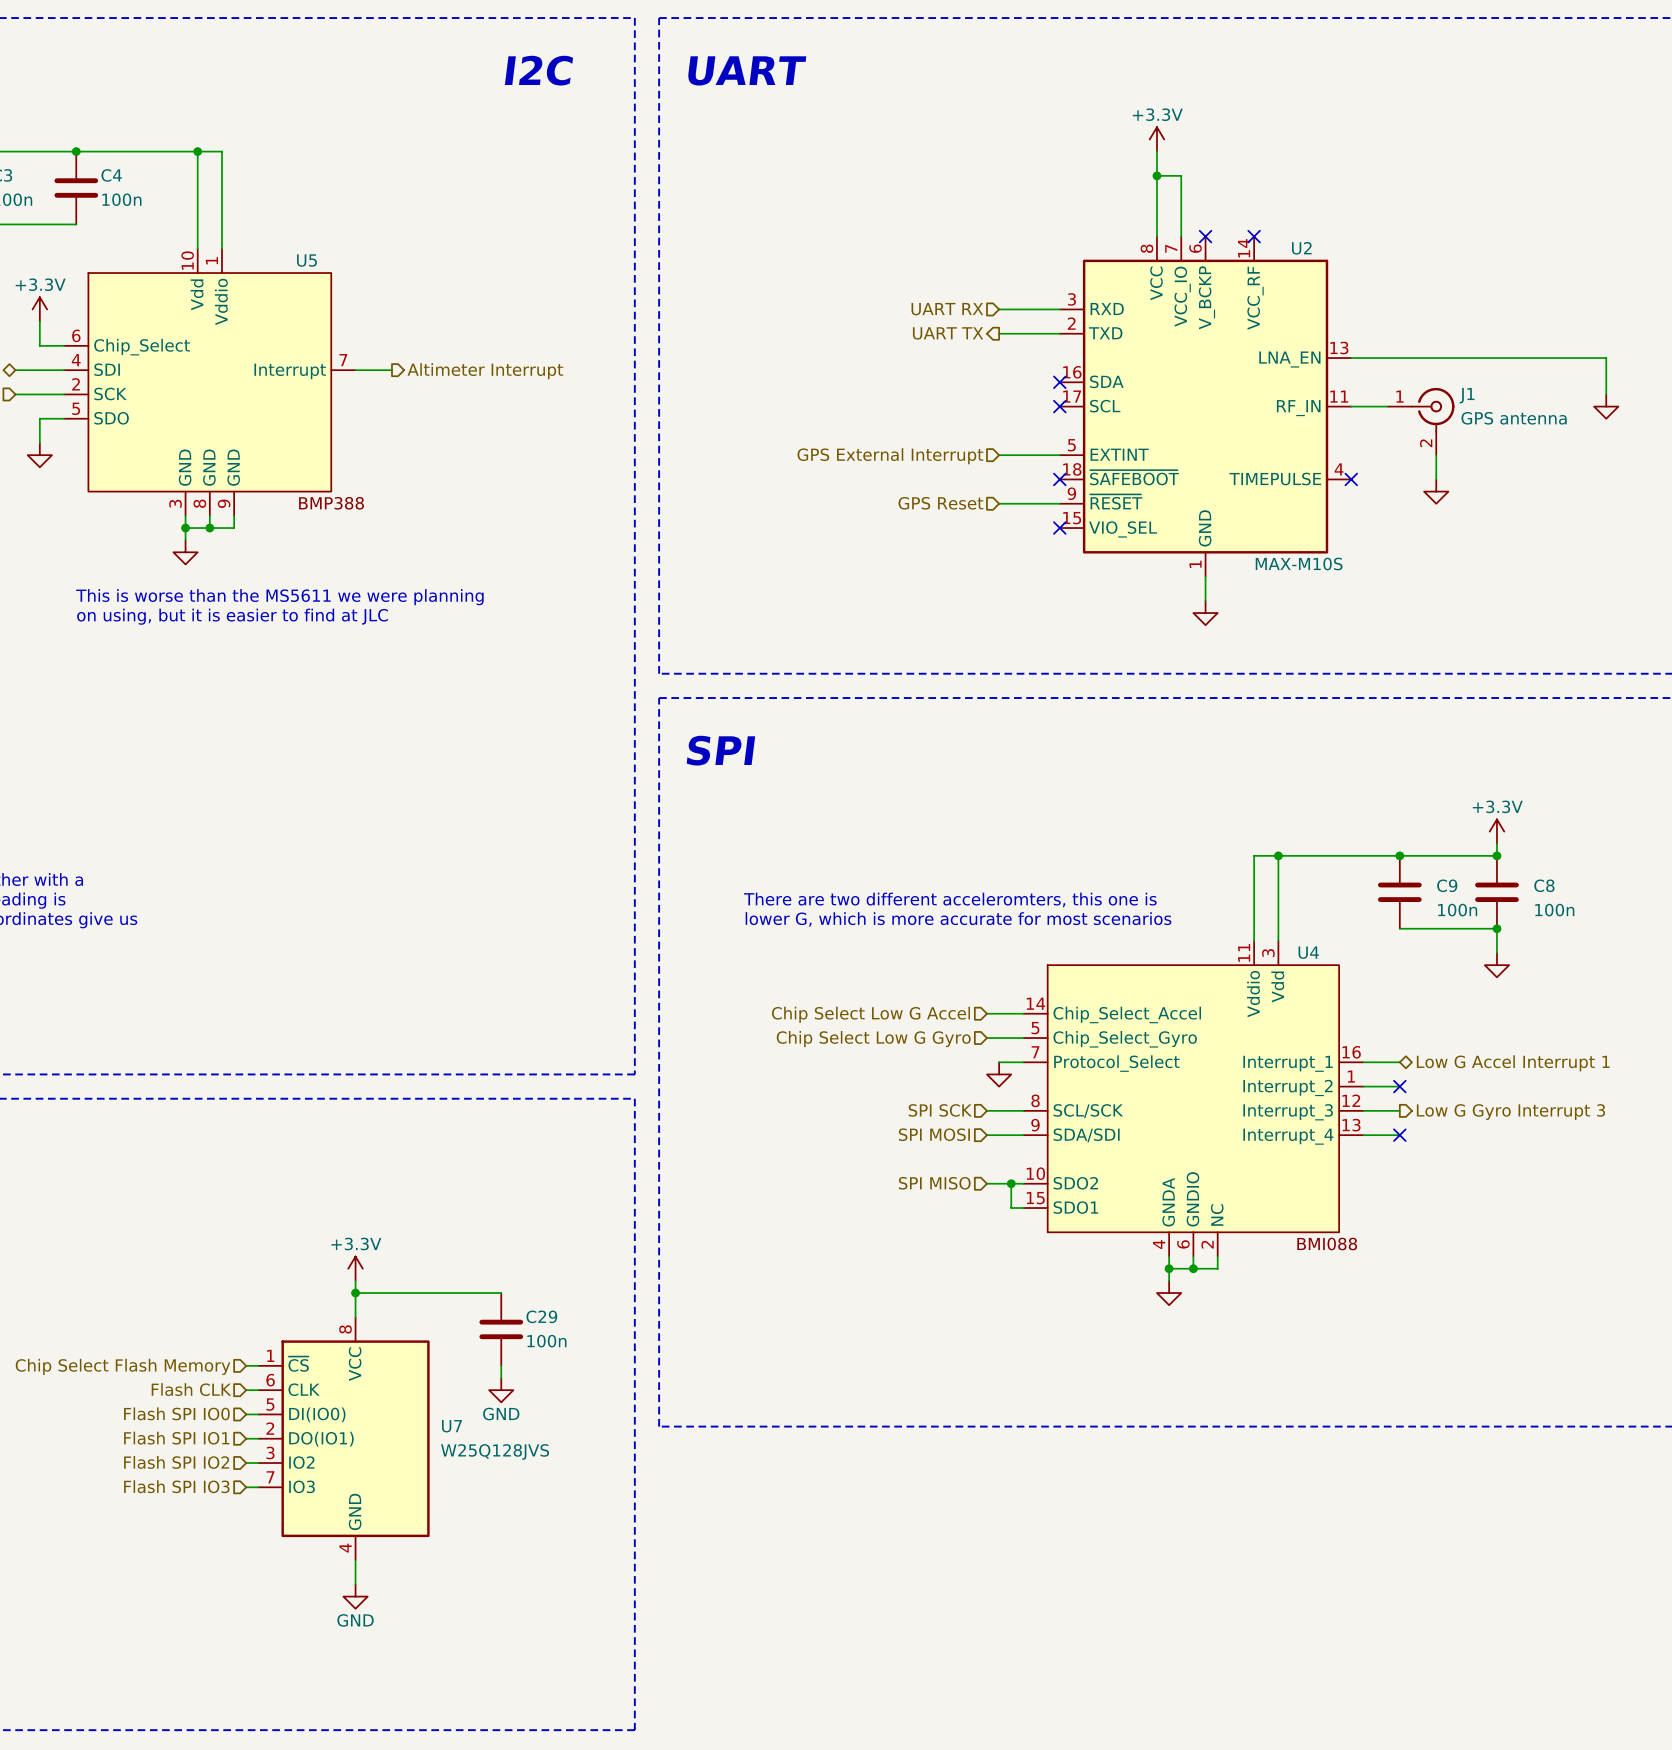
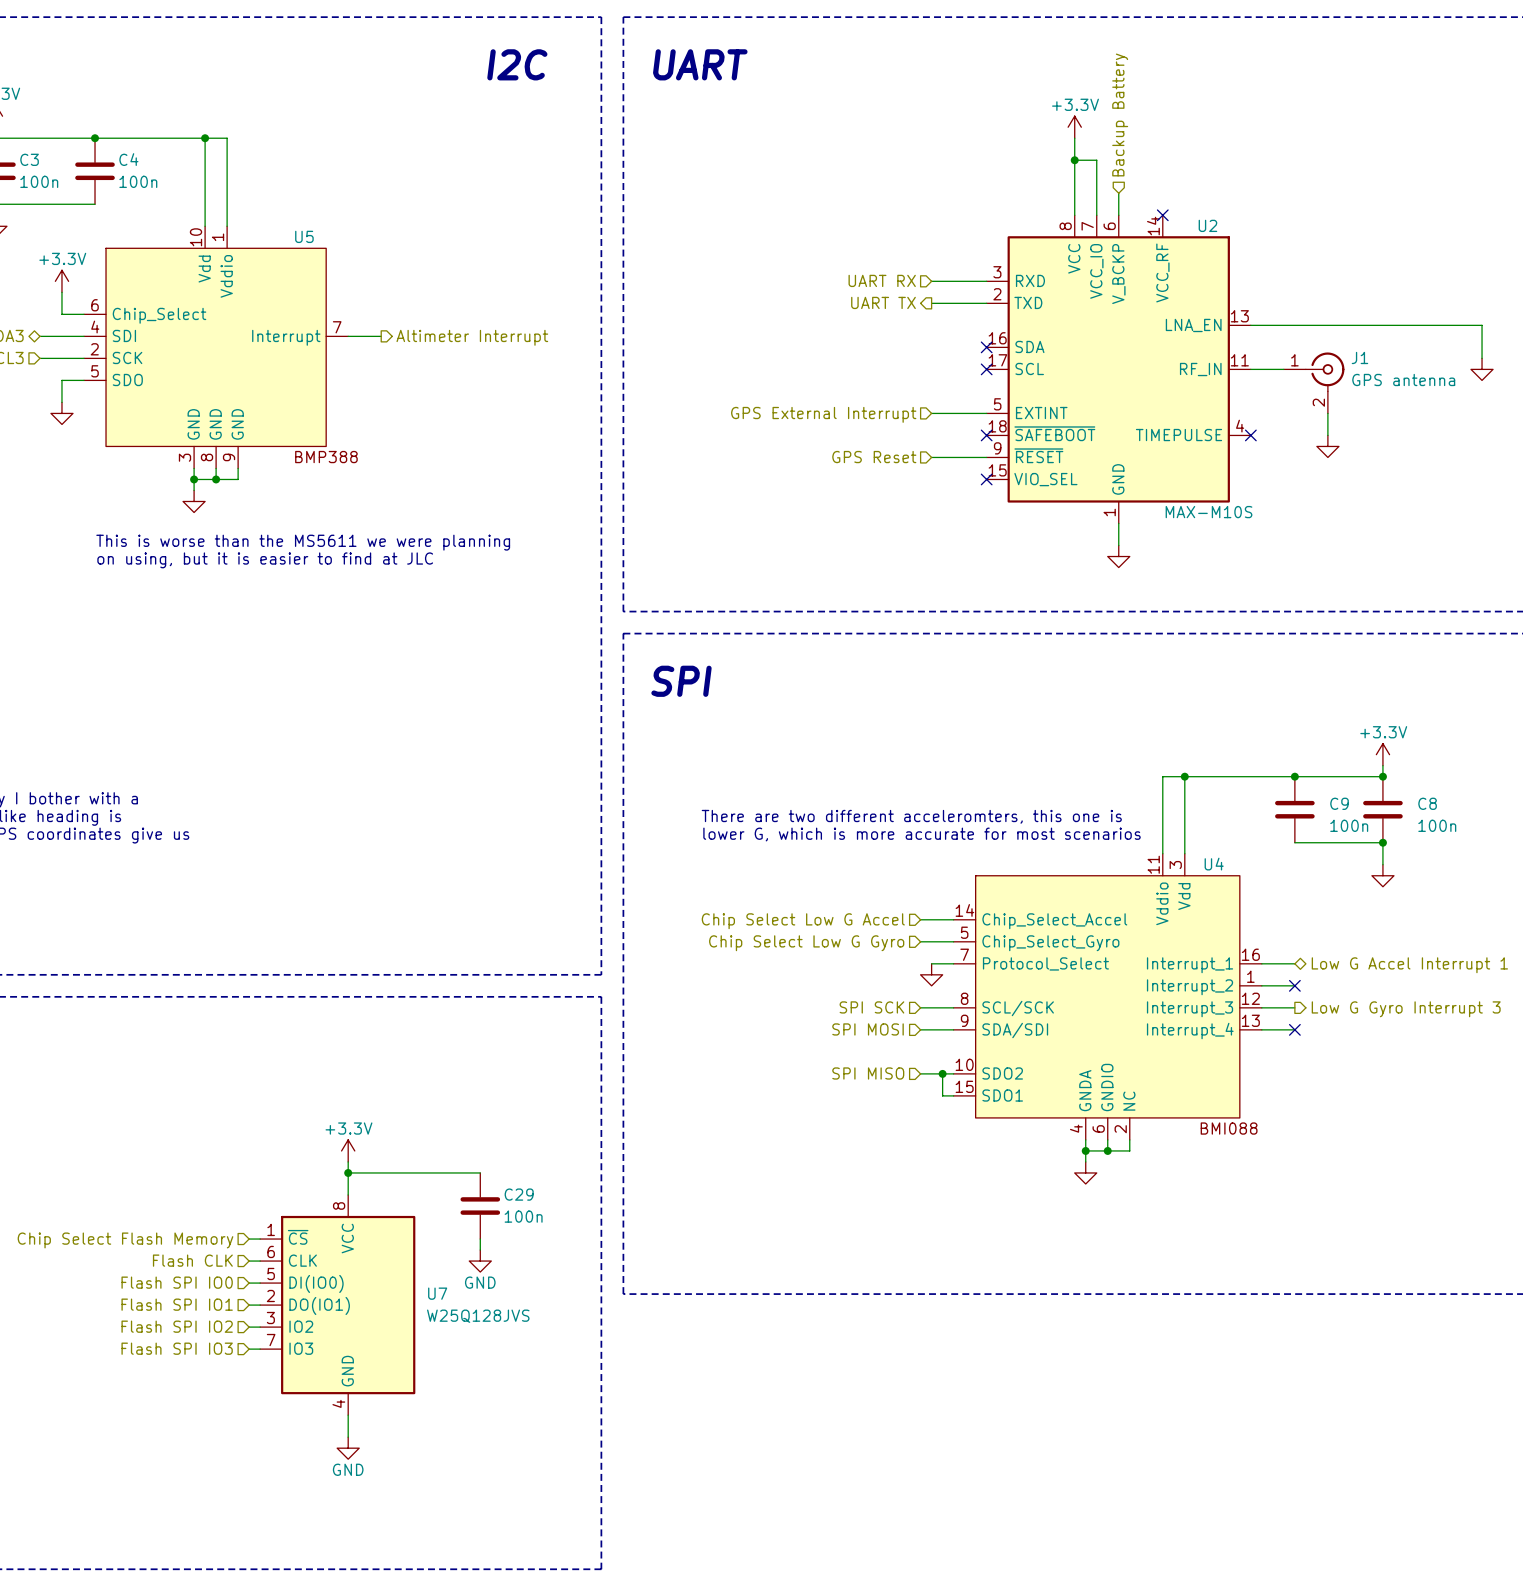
hierarchical label: none -> Backup Battery (1120, 114)
wire: none -> (1118, 193) (1118, 215)
no-connect mark: (1205, 236) -> none

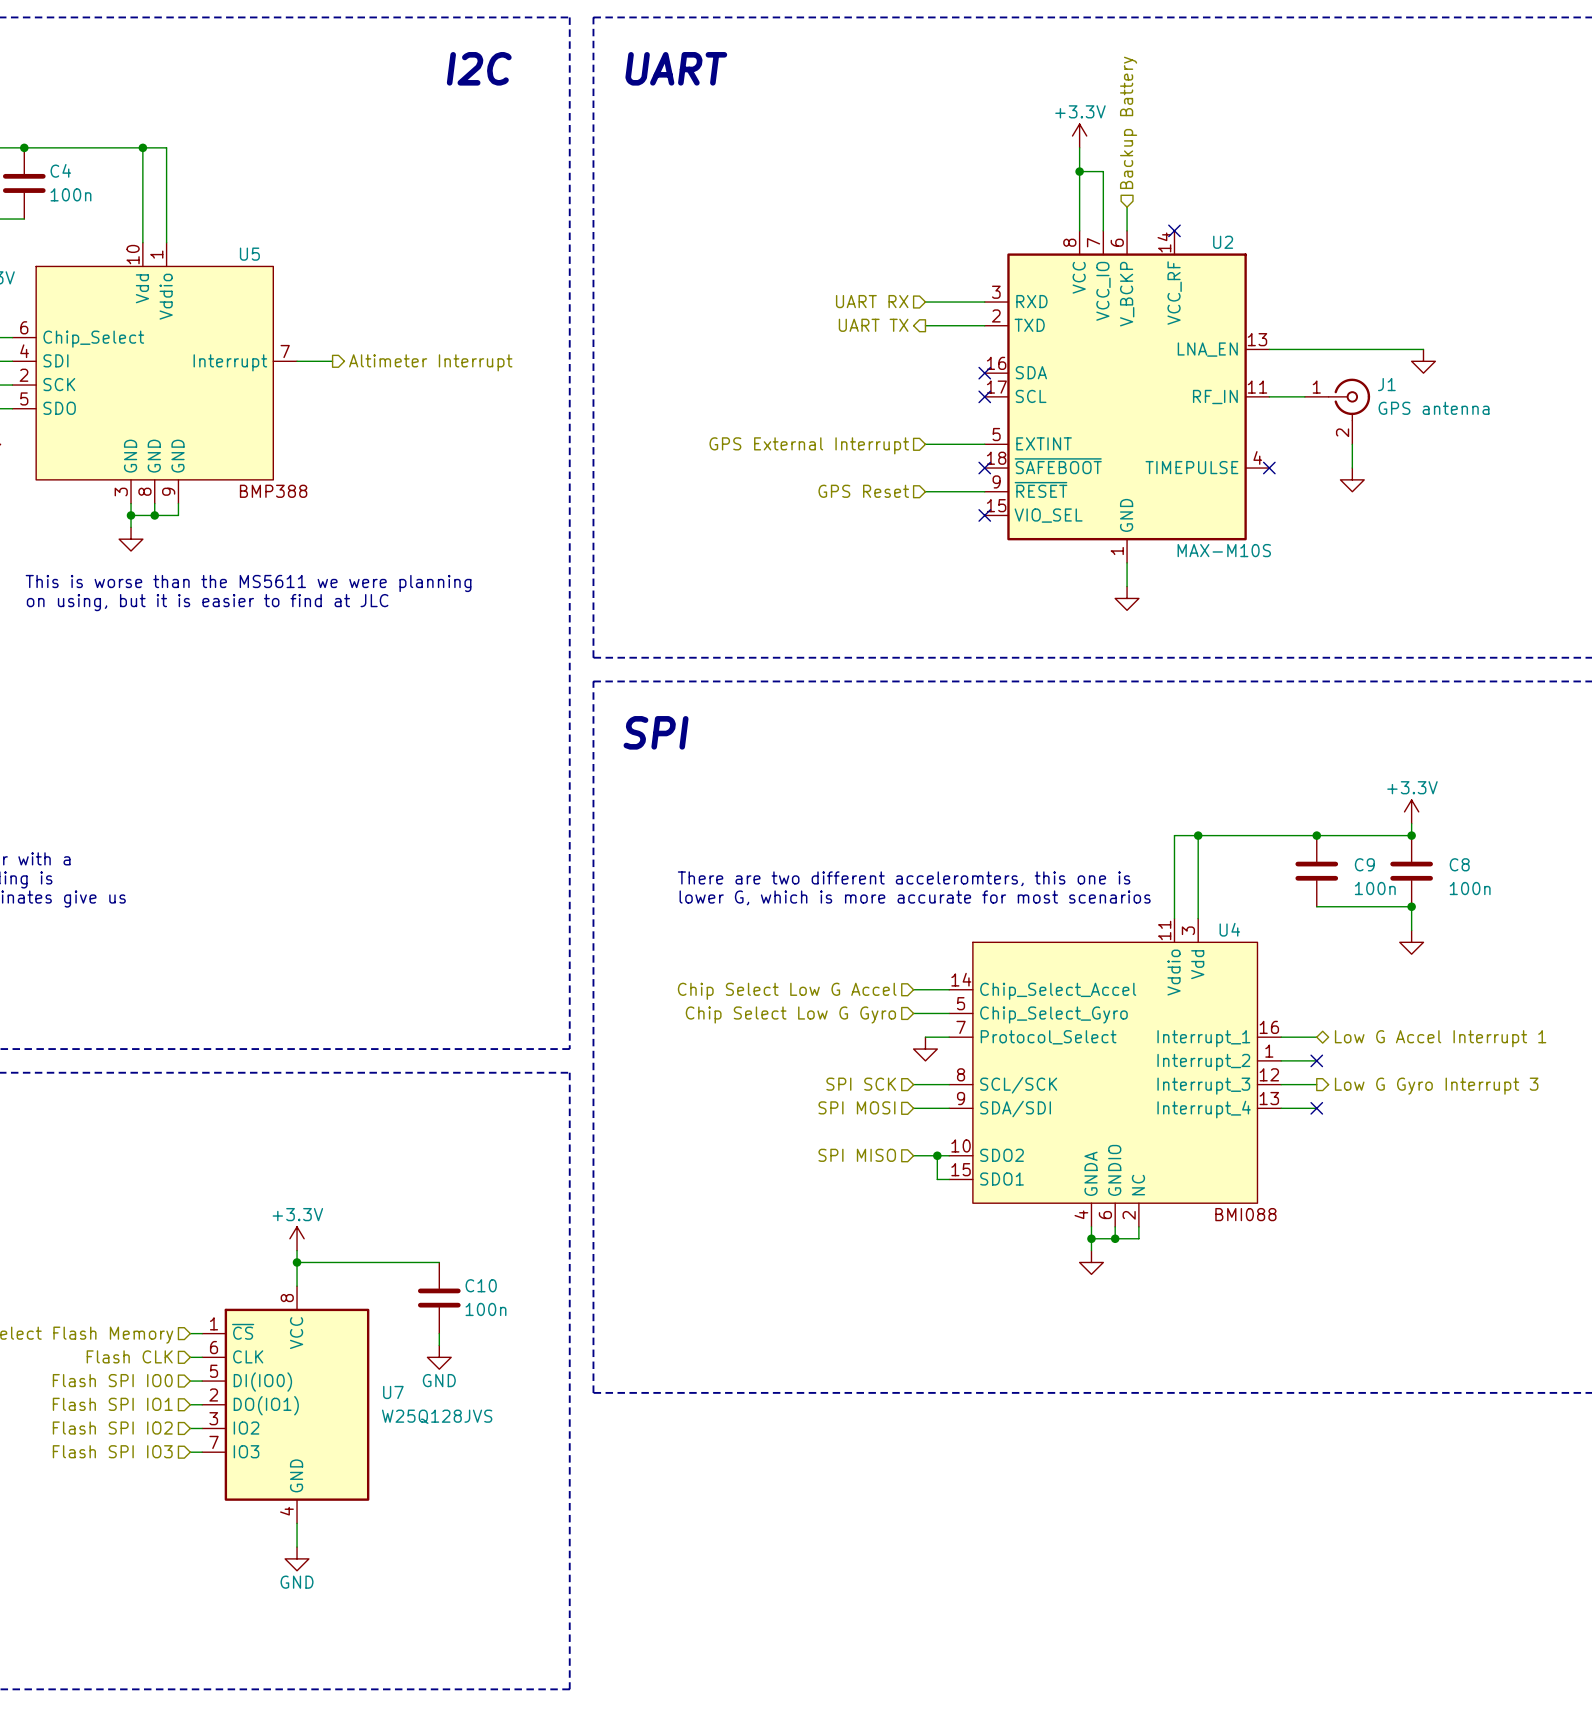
wire: (1393, 325) (1482, 325) (1482, 358) -> none
power symbol position: (1482, 369) -> (1423, 361)
C29 name: C29 (519, 1194) -> C10 (481, 1285)

